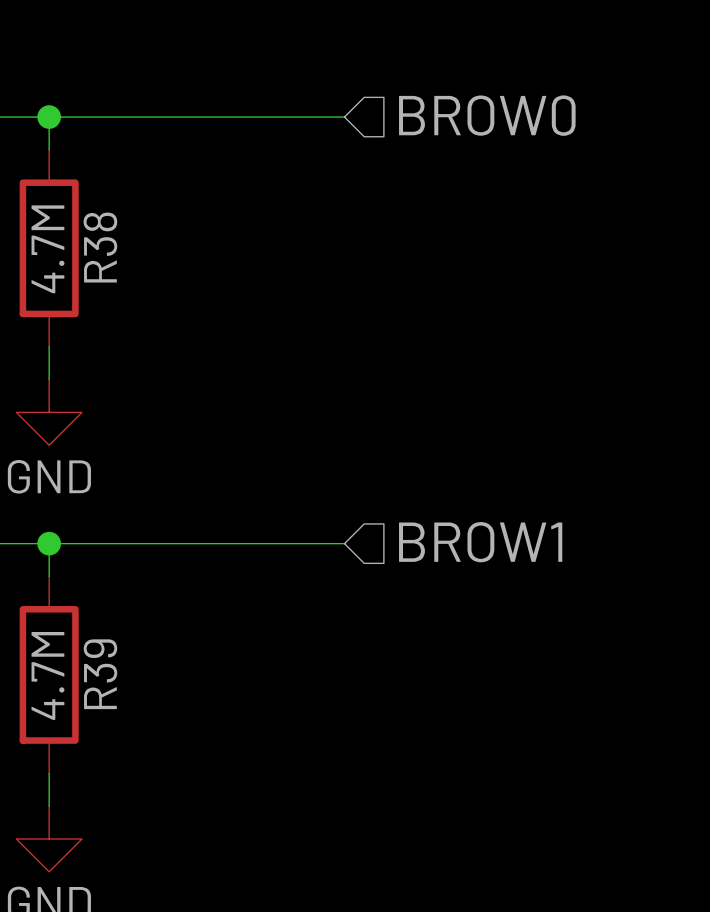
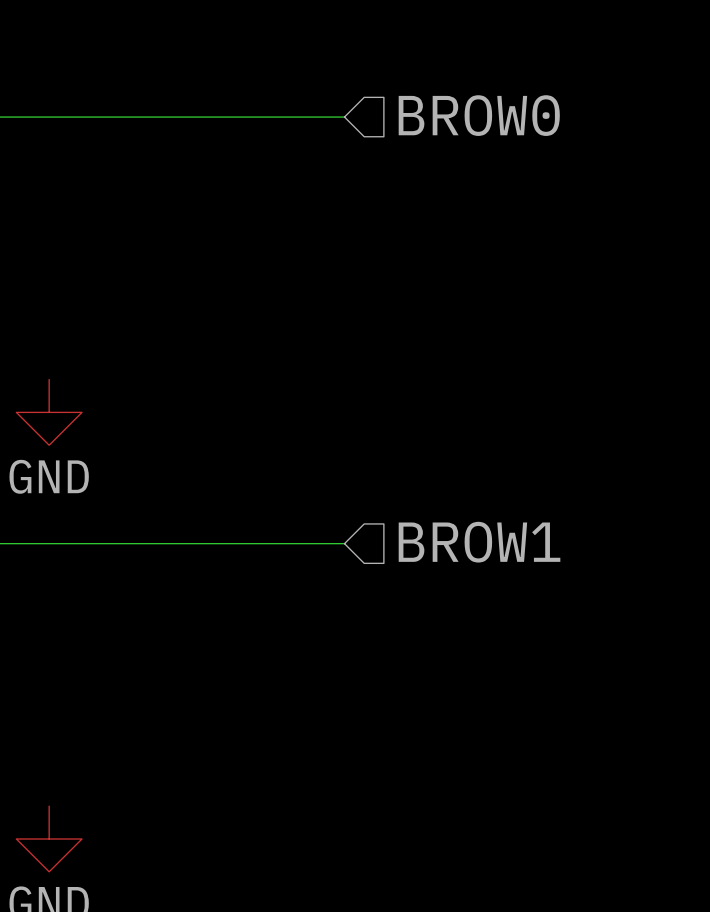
wire: (49, 117) (49, 149) -> none
junction: (49, 117) -> none
R38: 4.7M (49, 248) -> none
wire: (49, 346) (49, 379) -> none
wire: (49, 543) (49, 576) -> none
junction: (49, 543) -> none
R39: 4.7M (49, 674) -> none
wire: (49, 773) (49, 806) -> none

